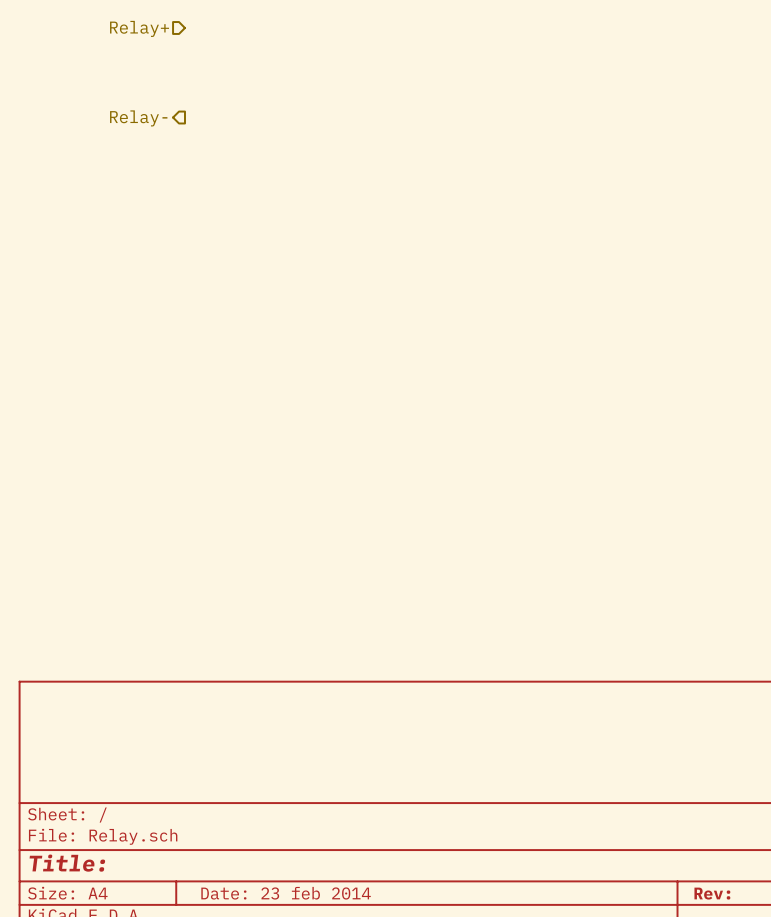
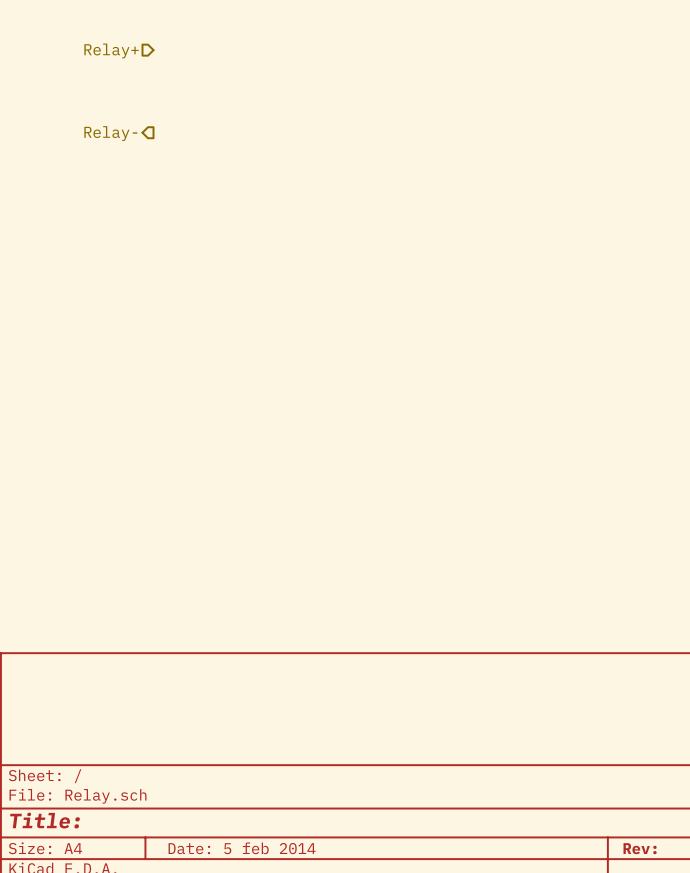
title block: Date: 23 feb 2014 (286, 893) -> Date: 5 feb 2014 (242, 848)

